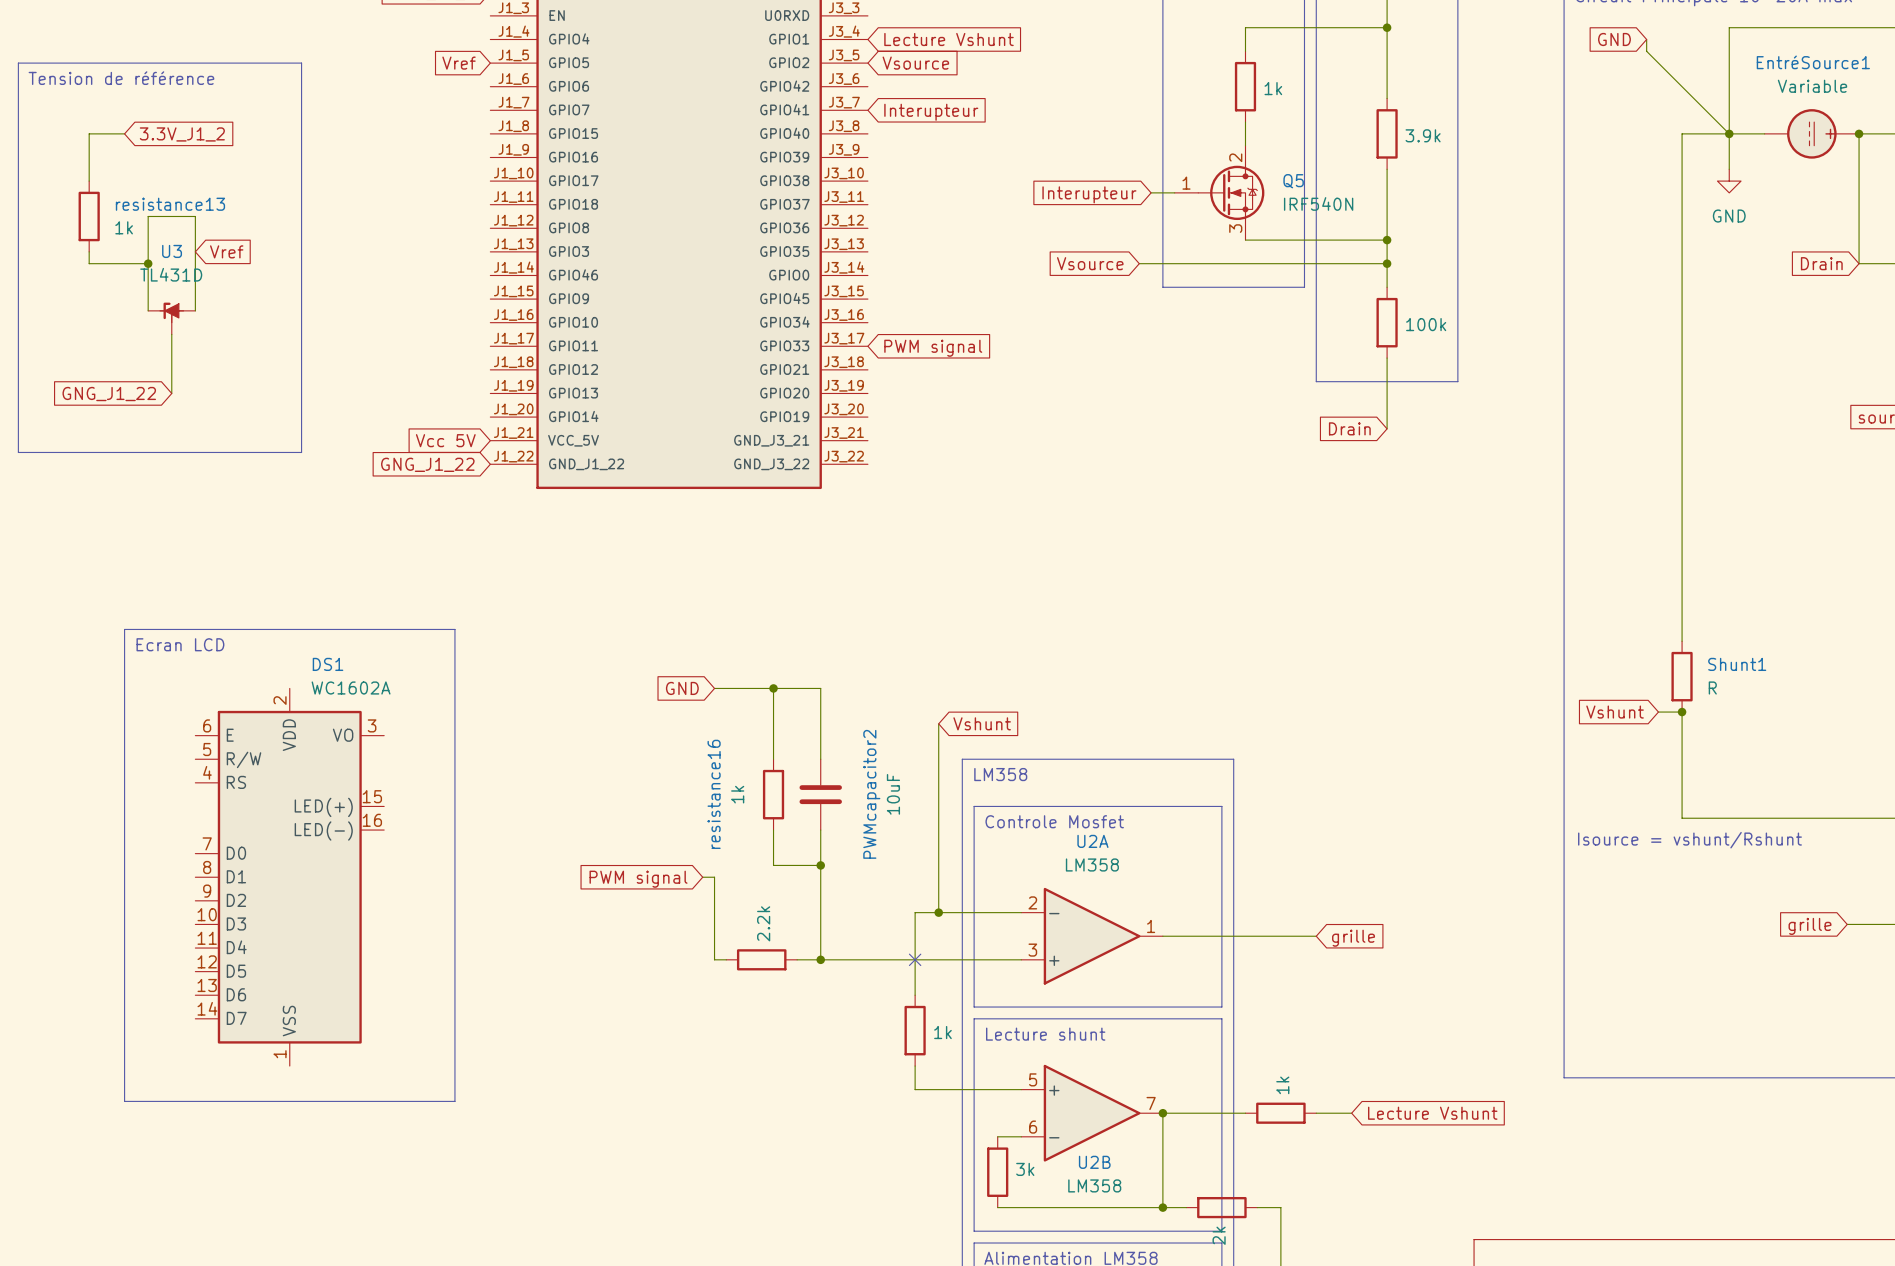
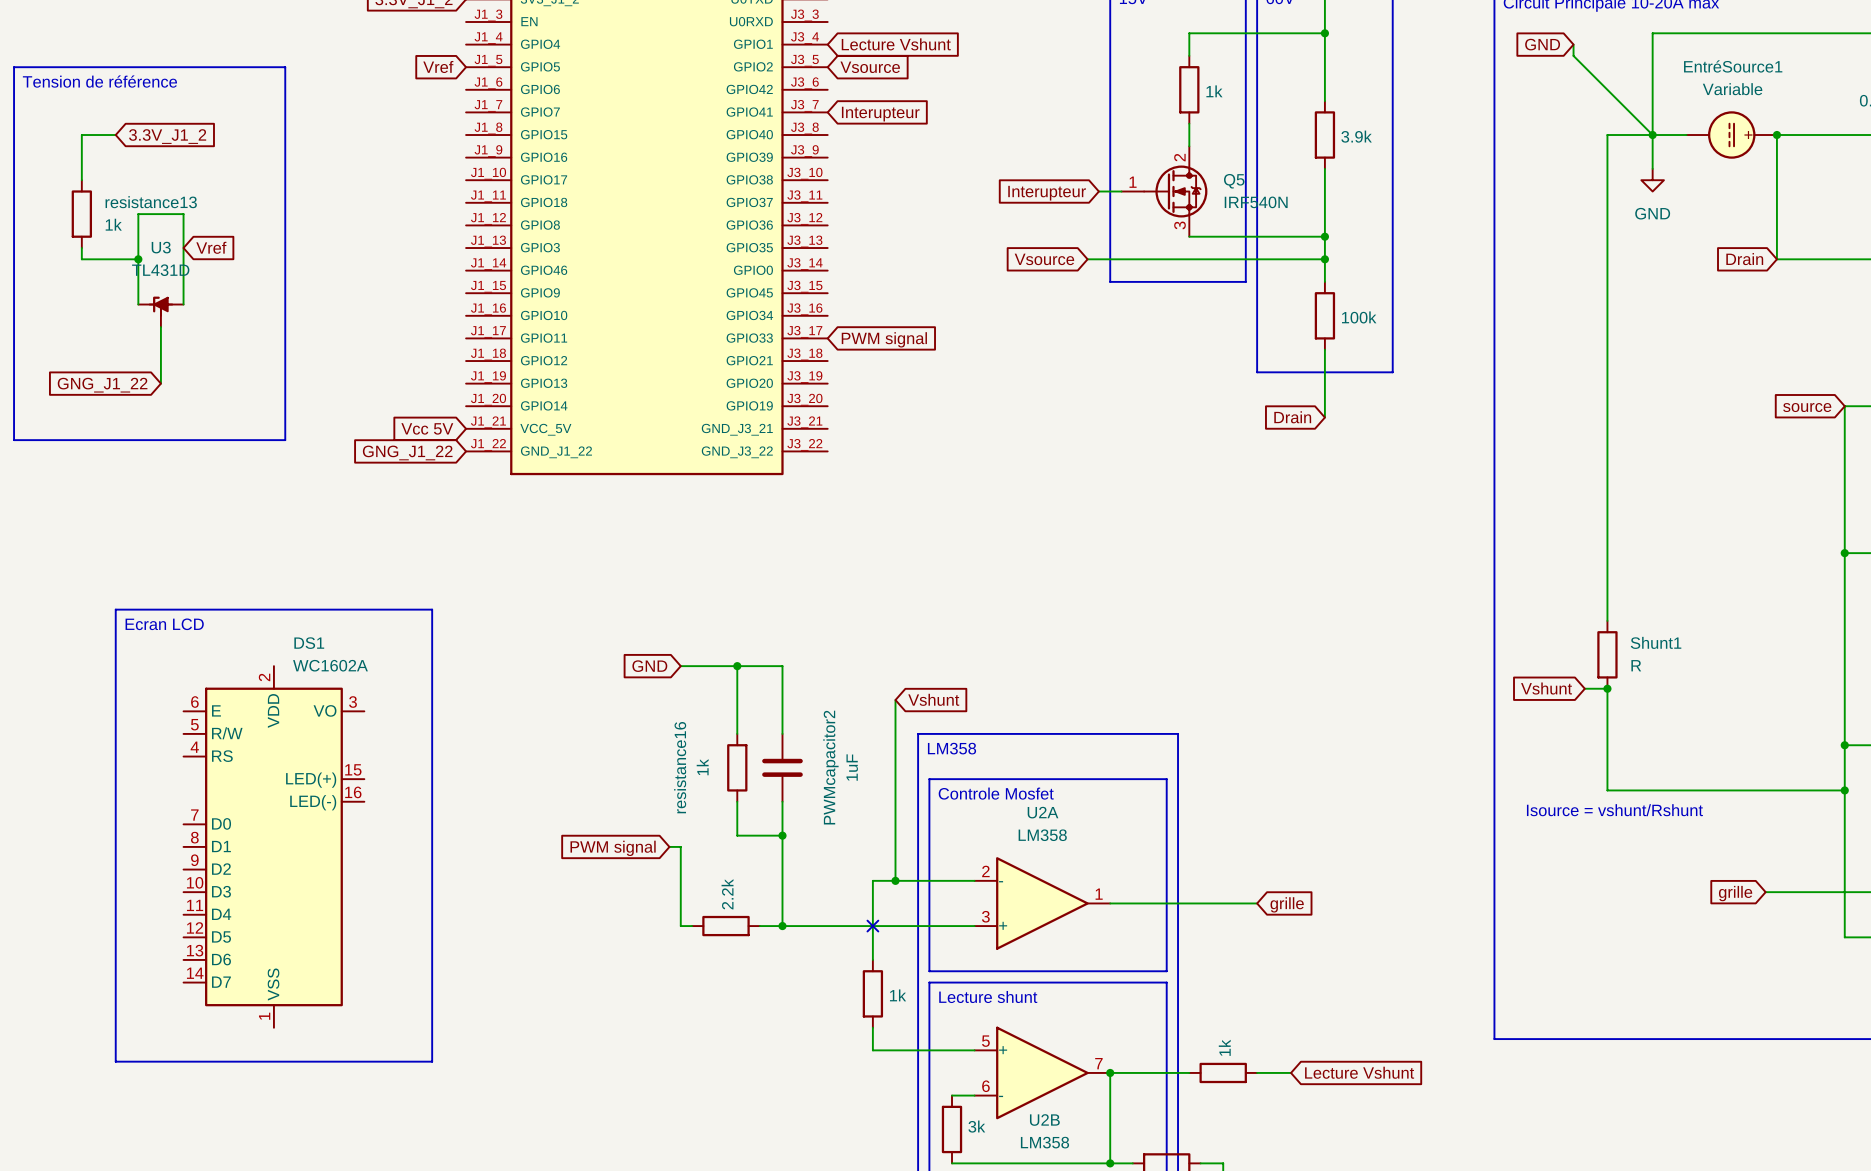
PWMcapacitor2 value: 10uF (893, 794) -> 1uF (852, 767)

